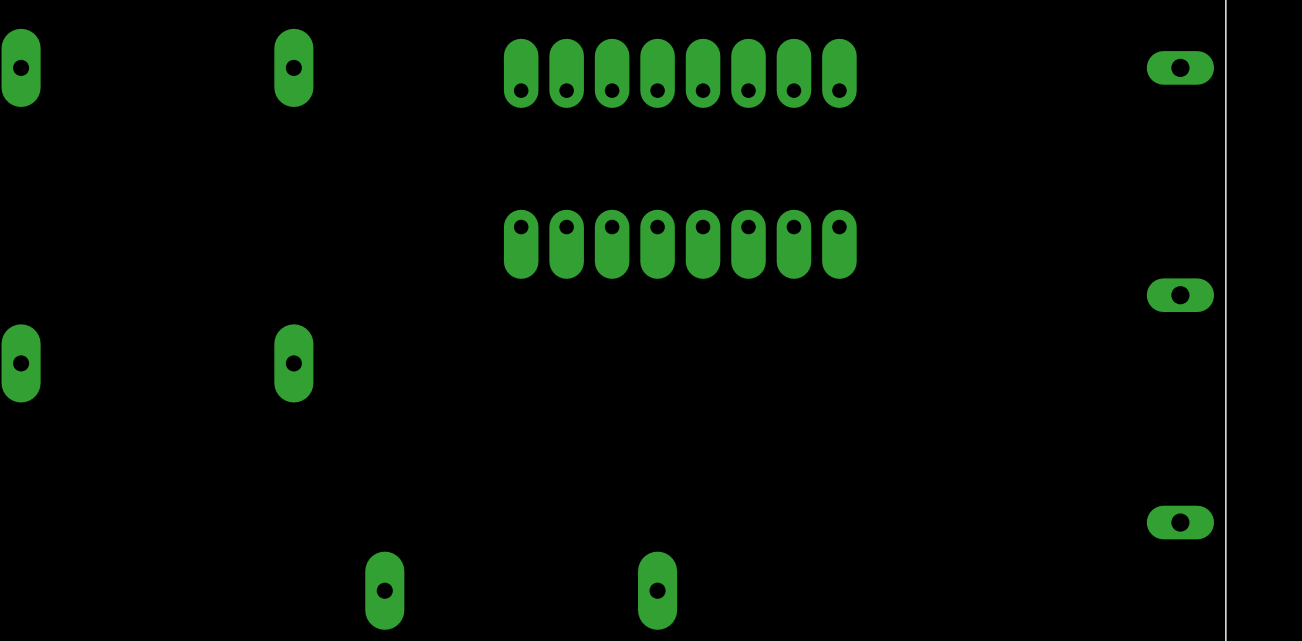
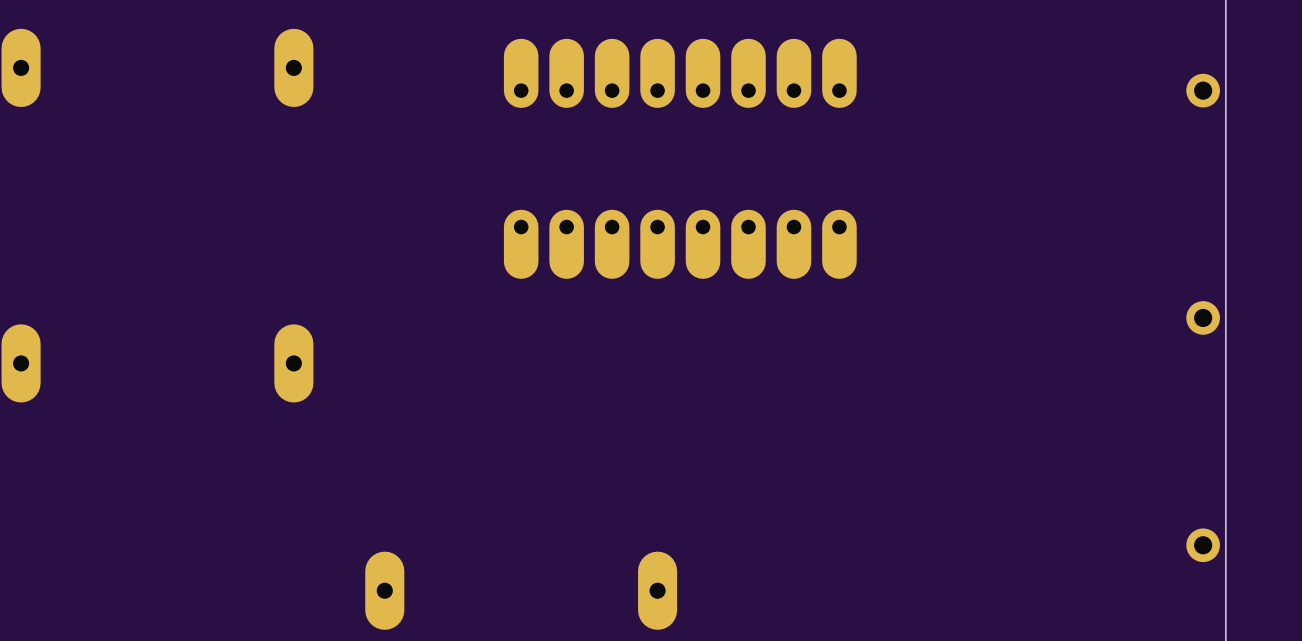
part: (1180, 67) -> none
part: none -> (1203, 90)
part: (1180, 295) -> none
part: none -> (1203, 317)
part: (1180, 522) -> none
part: none -> (1203, 545)

